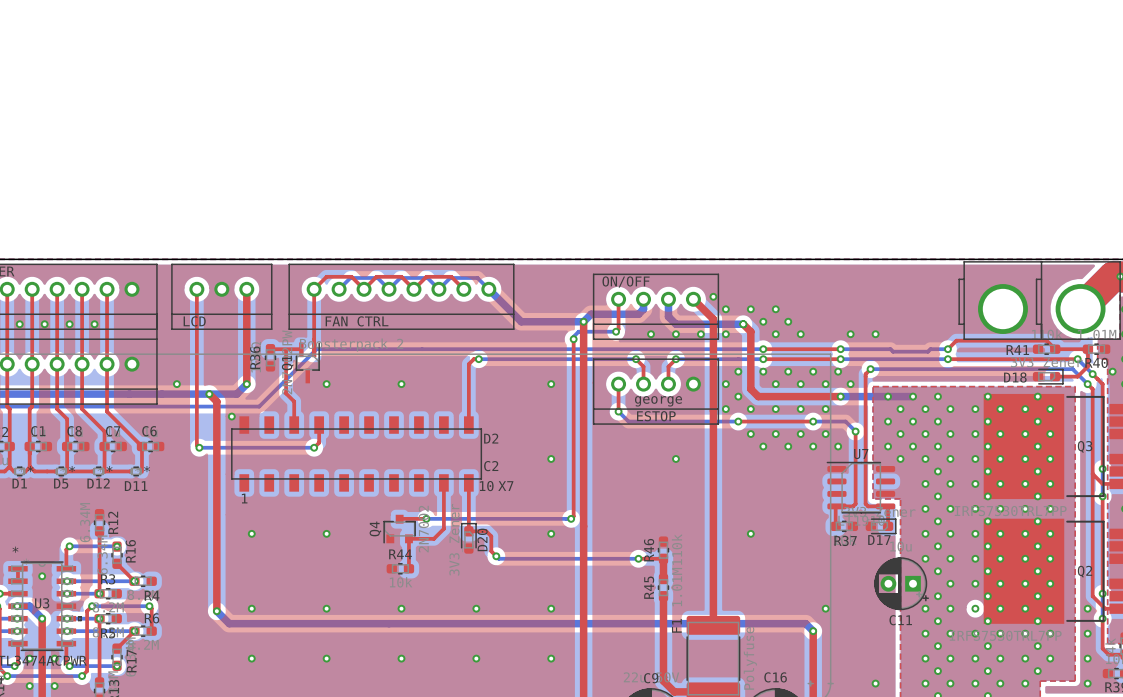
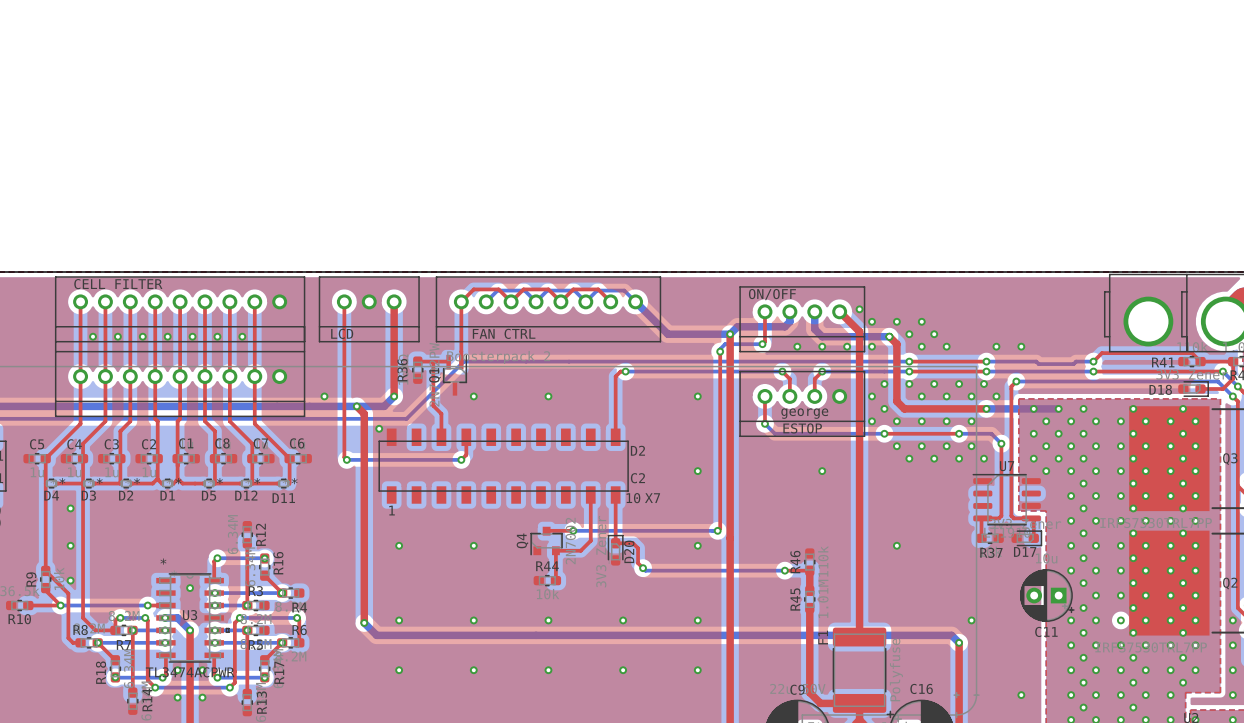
top track: (17, 568) (17, 581) -> none

